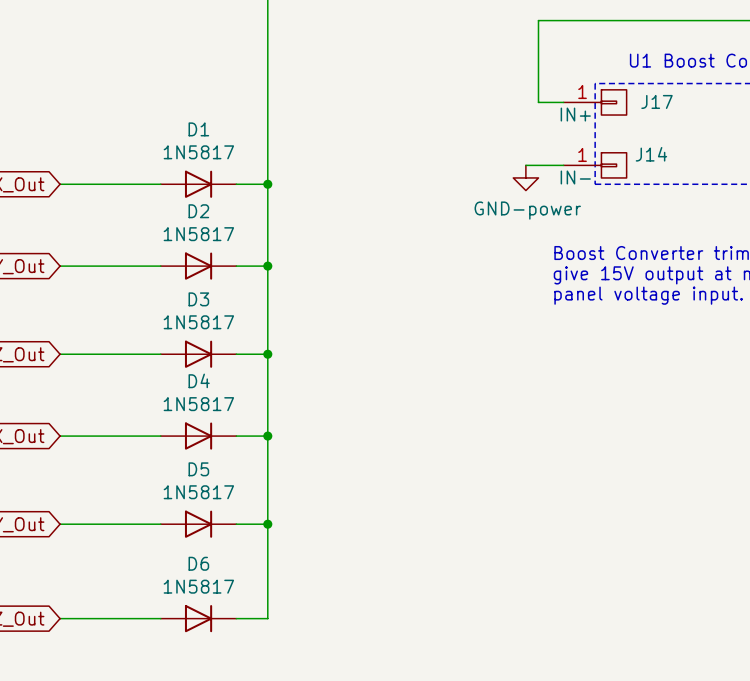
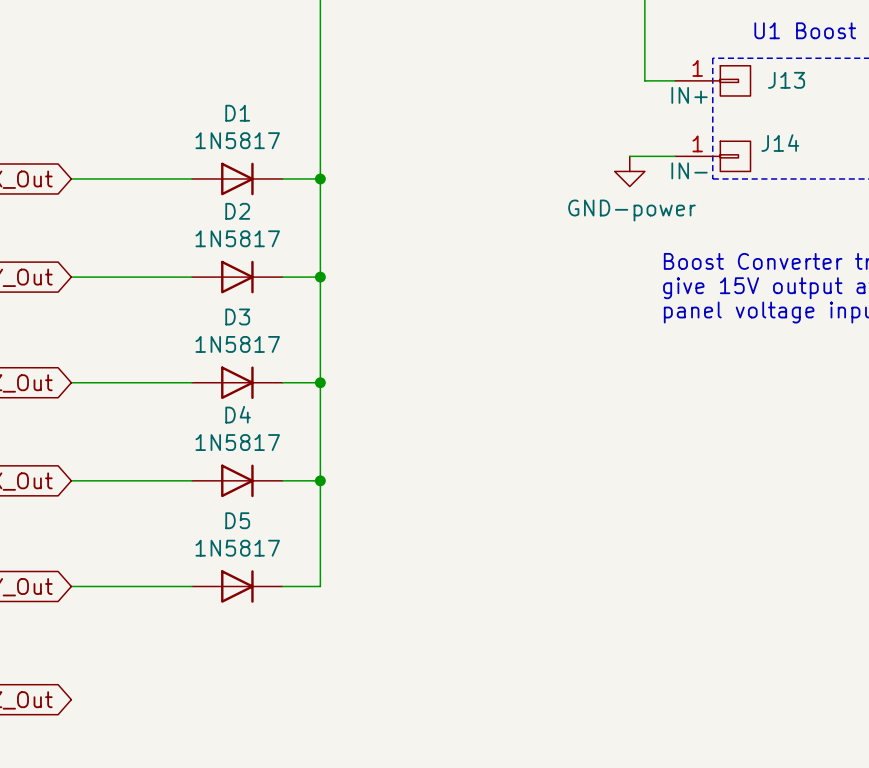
J17 name: J17 (656, 101) -> J13 (786, 80)
wire: (267, 524) (267, 618) (236, 618) -> none
junction: (267, 524) -> none
wire: (60, 618) (160, 618) -> none
D6: 1N5817 (198, 618) -> none

